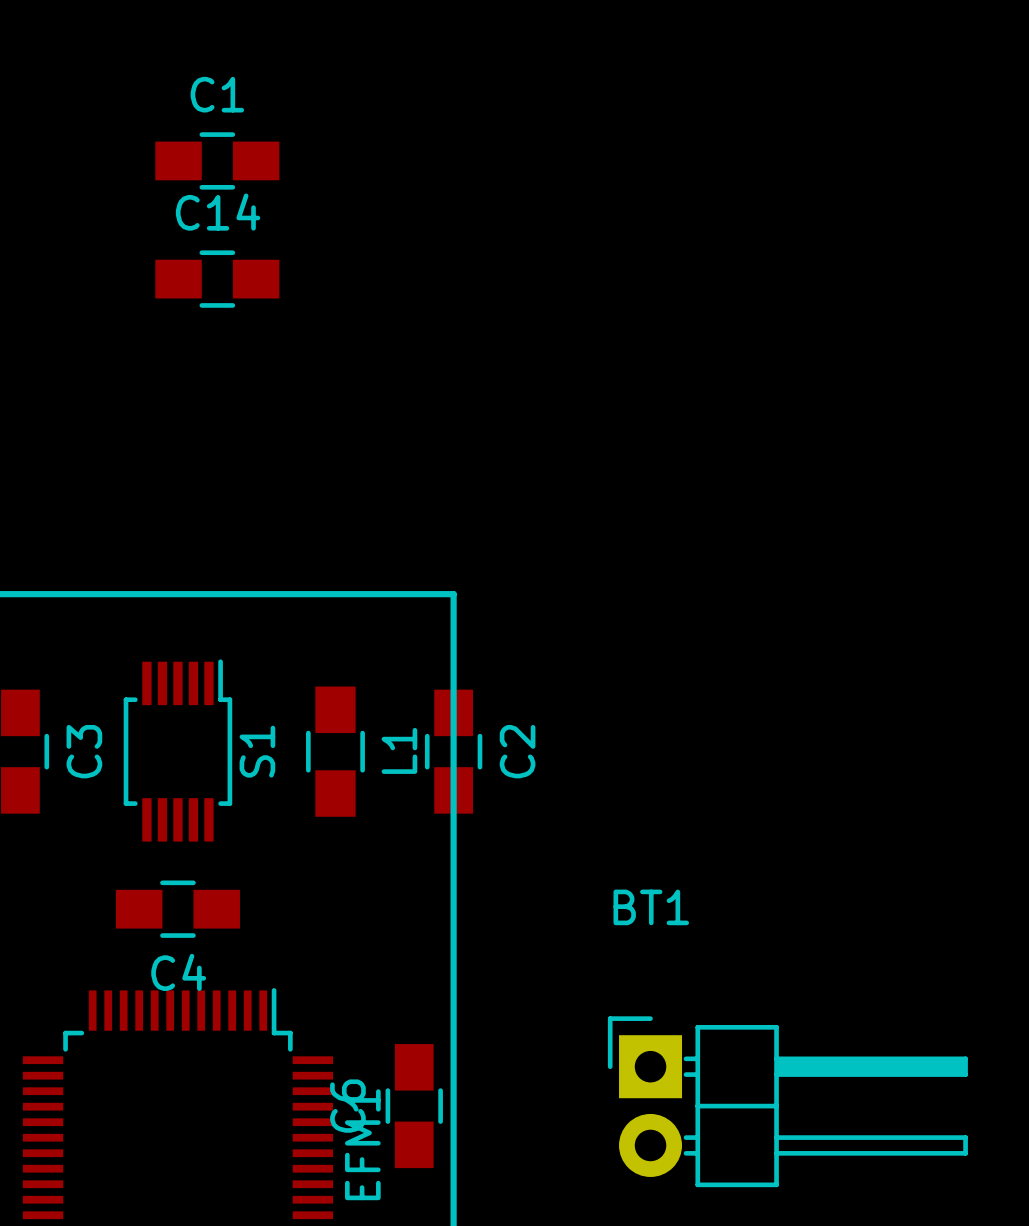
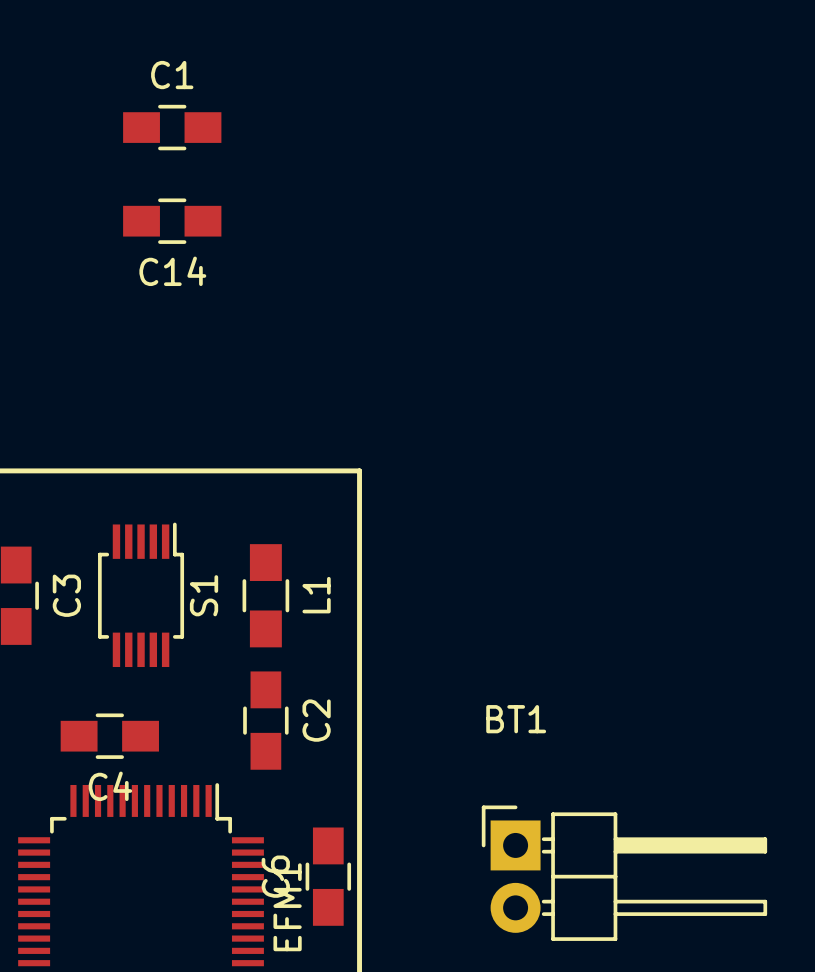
C14 name position: C14 (218, 212) -> C14 (172, 271)
C2 position: (453, 751) -> (265, 720)
C4 position: (177, 909) -> (109, 736)

